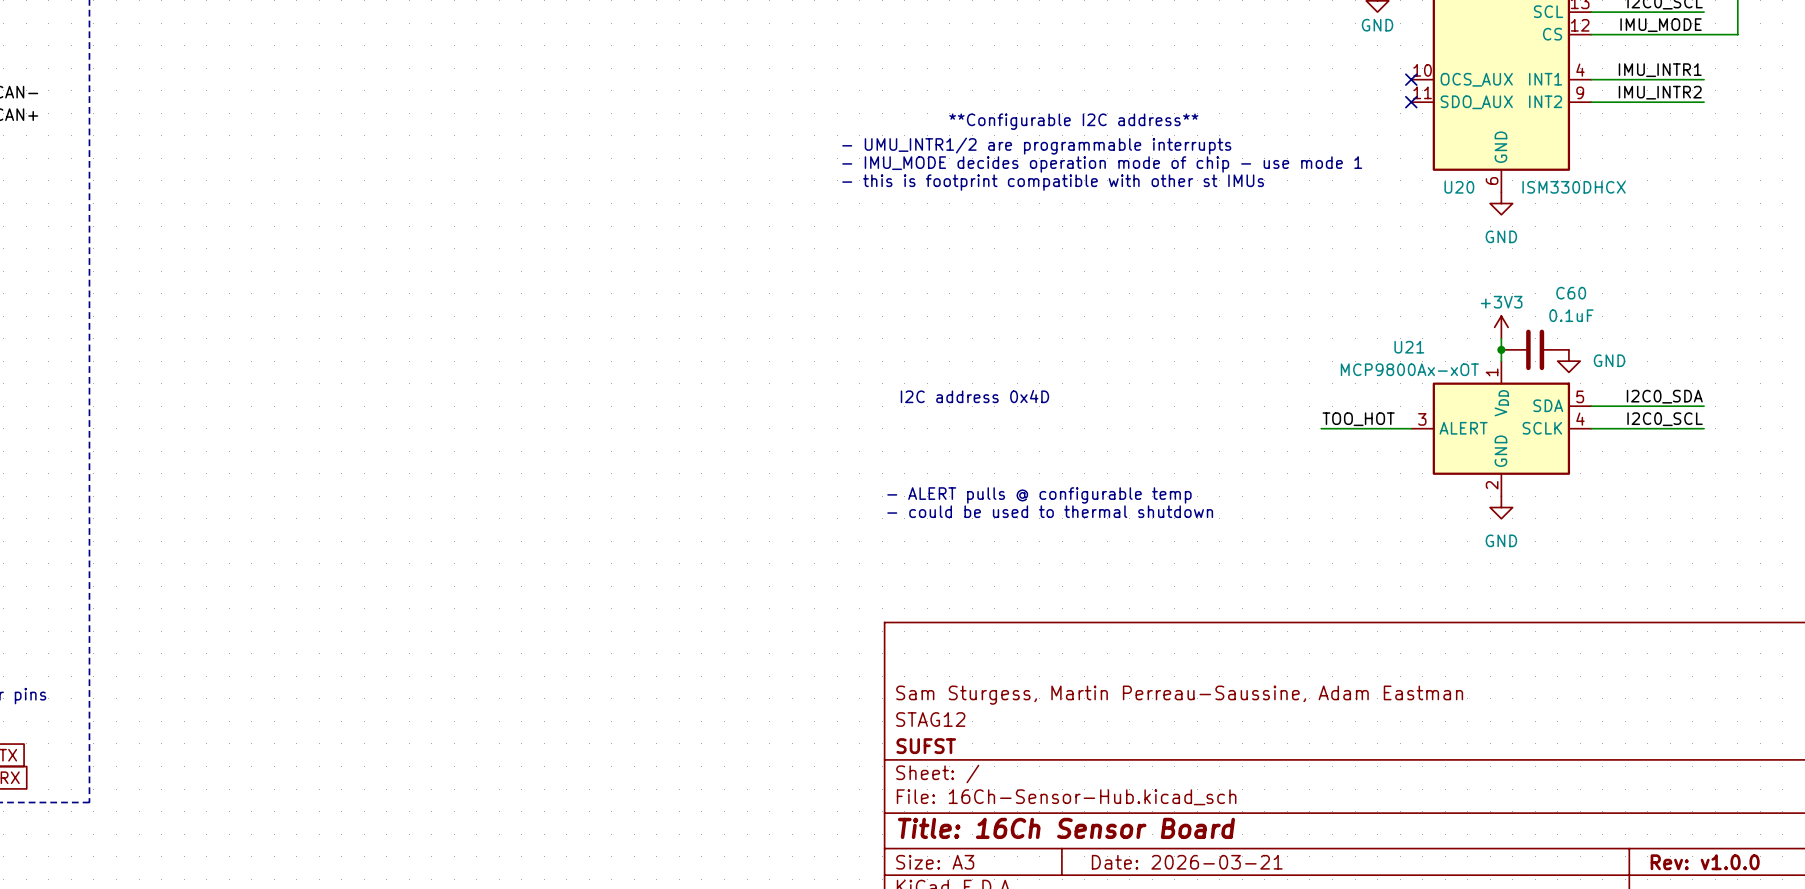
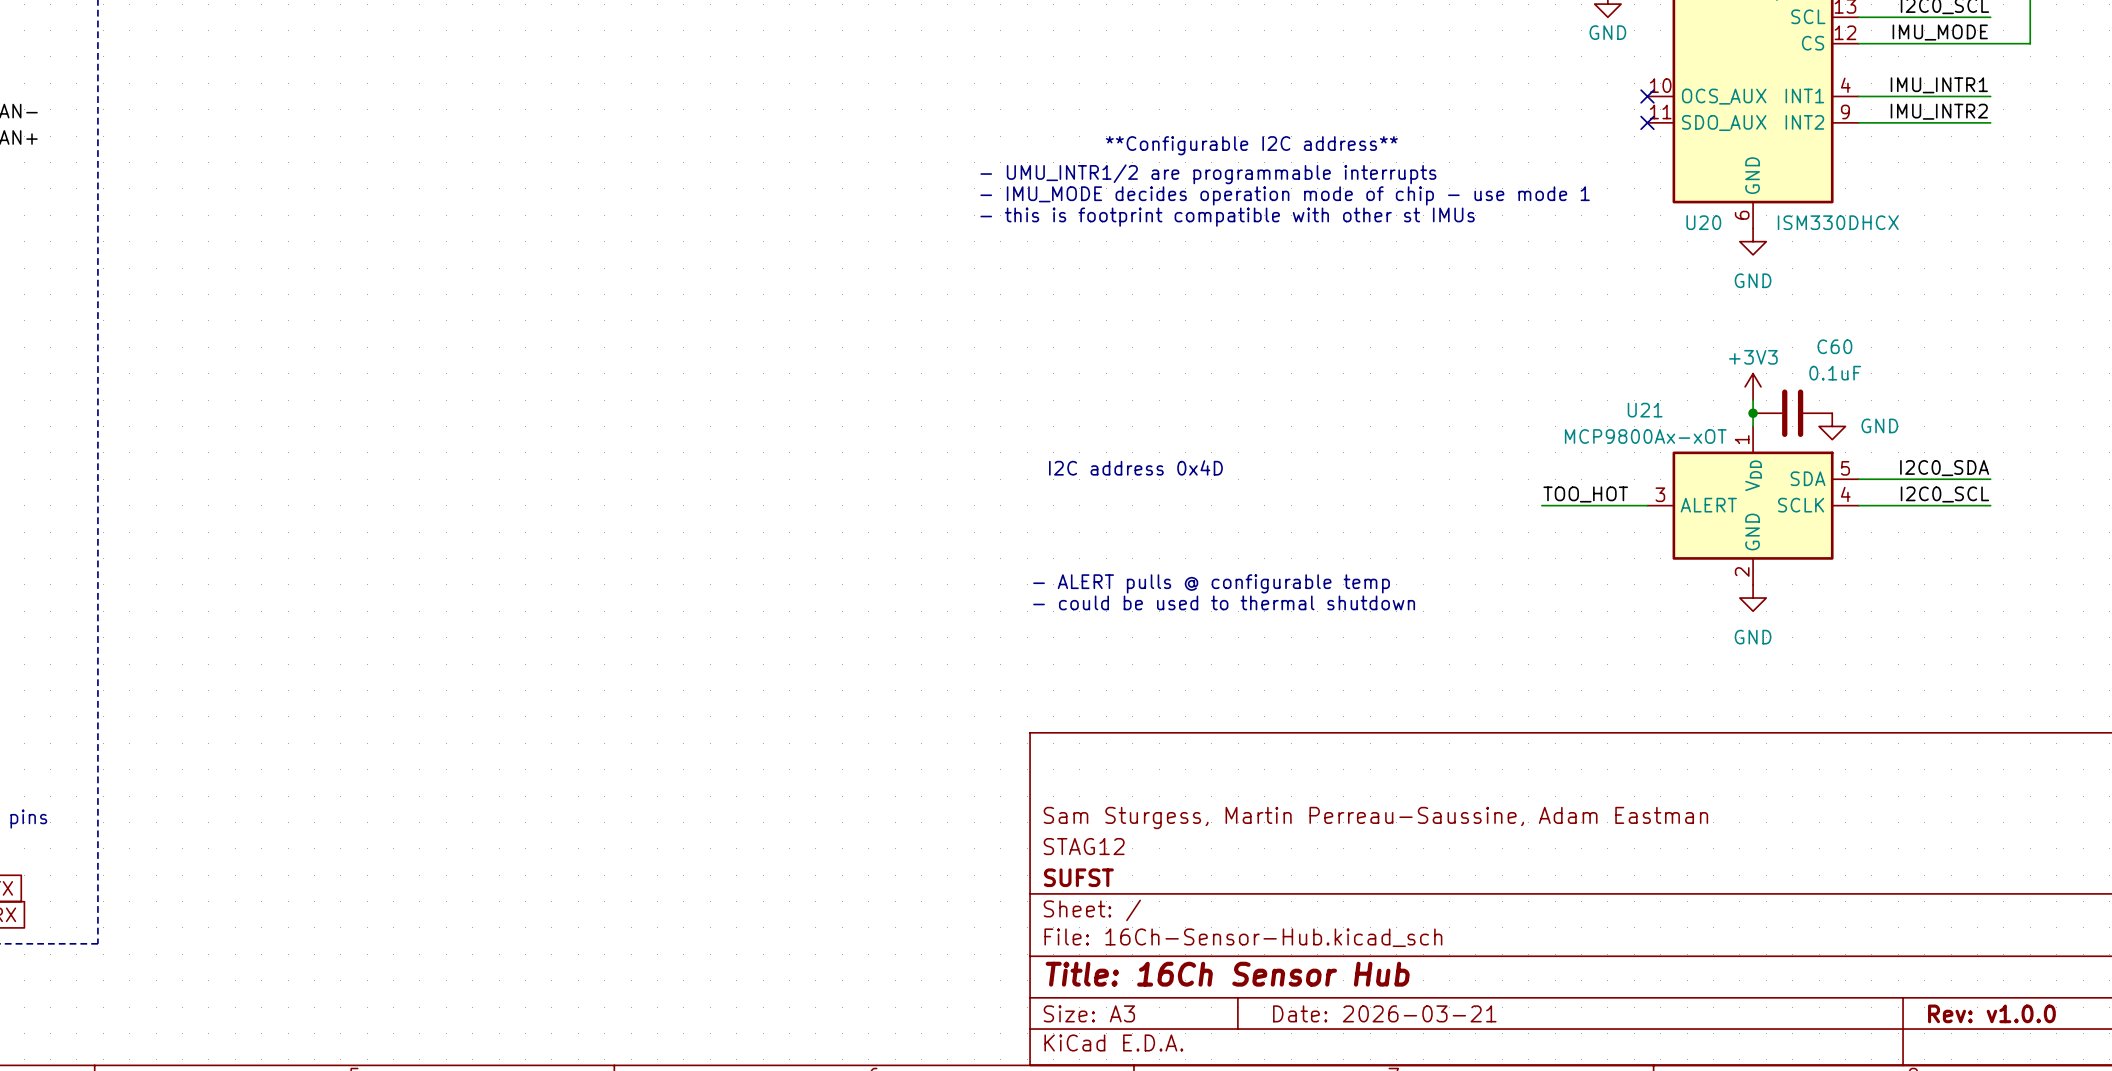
title block: Title: 16Ch Sensor Board (1066, 828) -> Title: 16Ch Sensor Hub (1227, 974)

